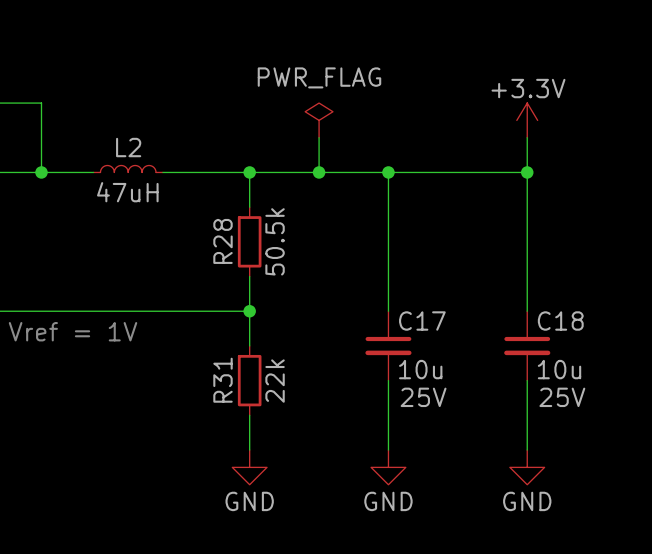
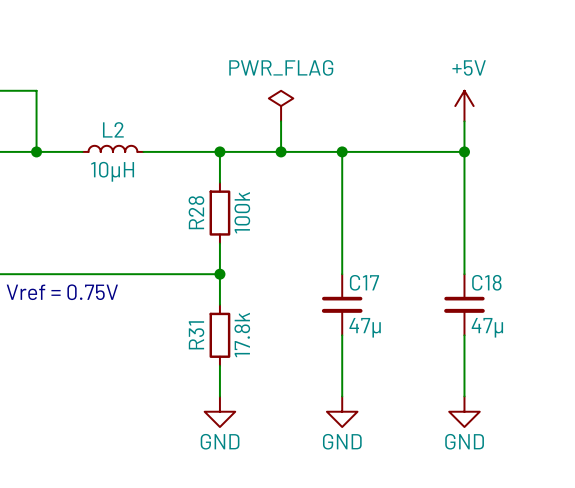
power symbol: +3.3V (527, 120) -> +5V (464, 106)
L2 value: 47uH (127, 192) -> 10µH (112, 171)
R28 value: 50.5k (275, 241) -> 100k (242, 212)
text: Vref = 1V (73, 331) -> Vref = 0.75V (62, 292)
C17 value: 10u (420, 369) -> 47µ (365, 327)
C18 value: 10u (559, 369) -> 47µ (487, 327)
R31 value: 22k (275, 381) -> 17.8k (242, 335)
C17 text: 25V (423, 397) -> none
C18 text: 25V (562, 397) -> none

